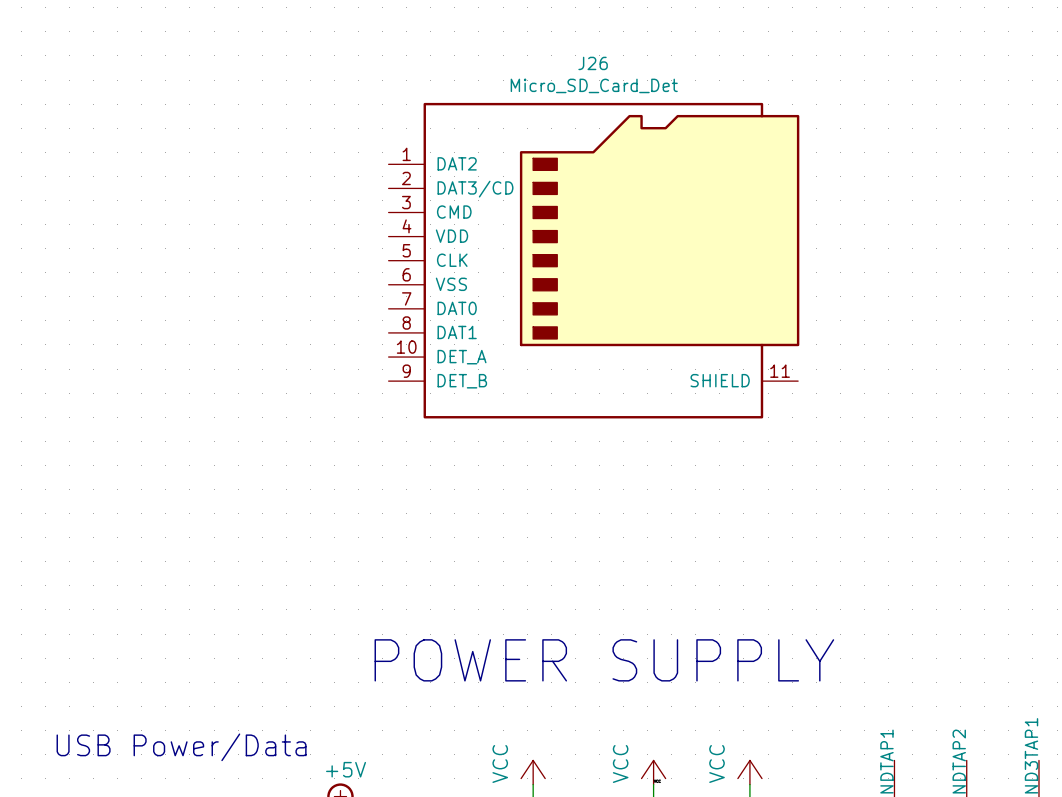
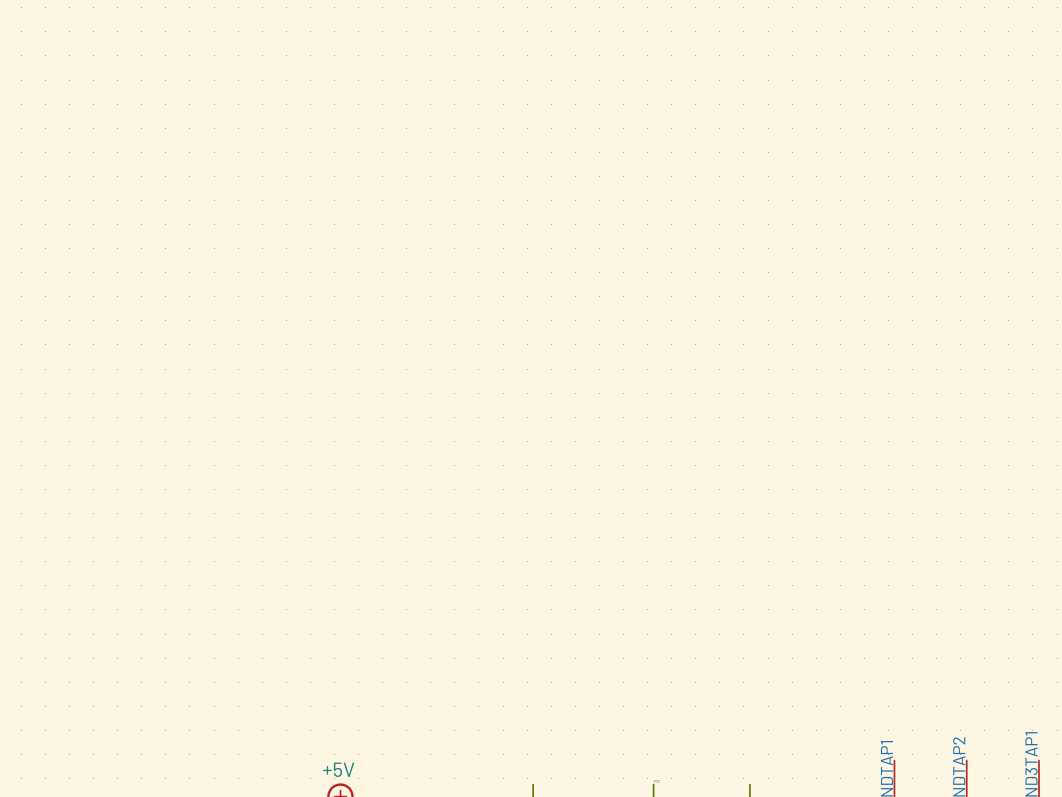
J26: Micro_SD_Card_Det (593, 260) -> none
text: POWER SUPPLY (604, 660) -> none
text: USB Power/Data (181, 747) -> none
power symbol: VCC (533, 772) -> none
power symbol: VCC (653, 772) -> none
power symbol: VCC (749, 772) -> none

